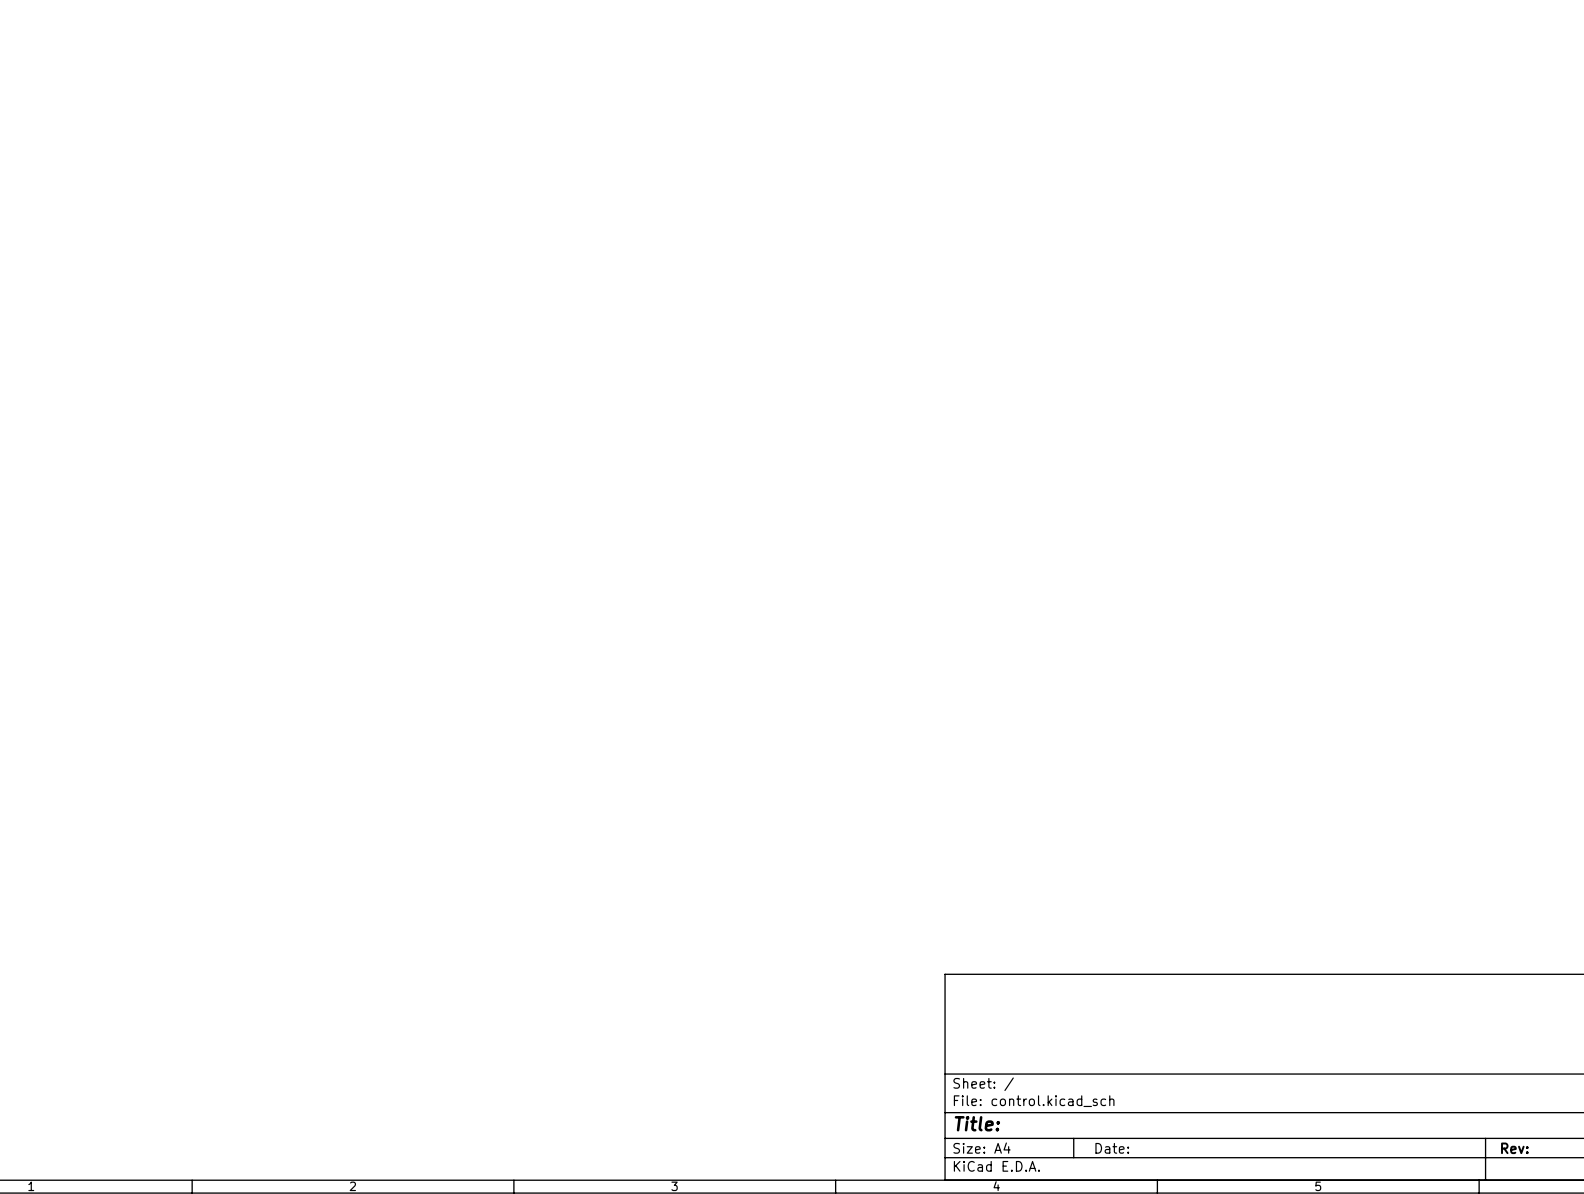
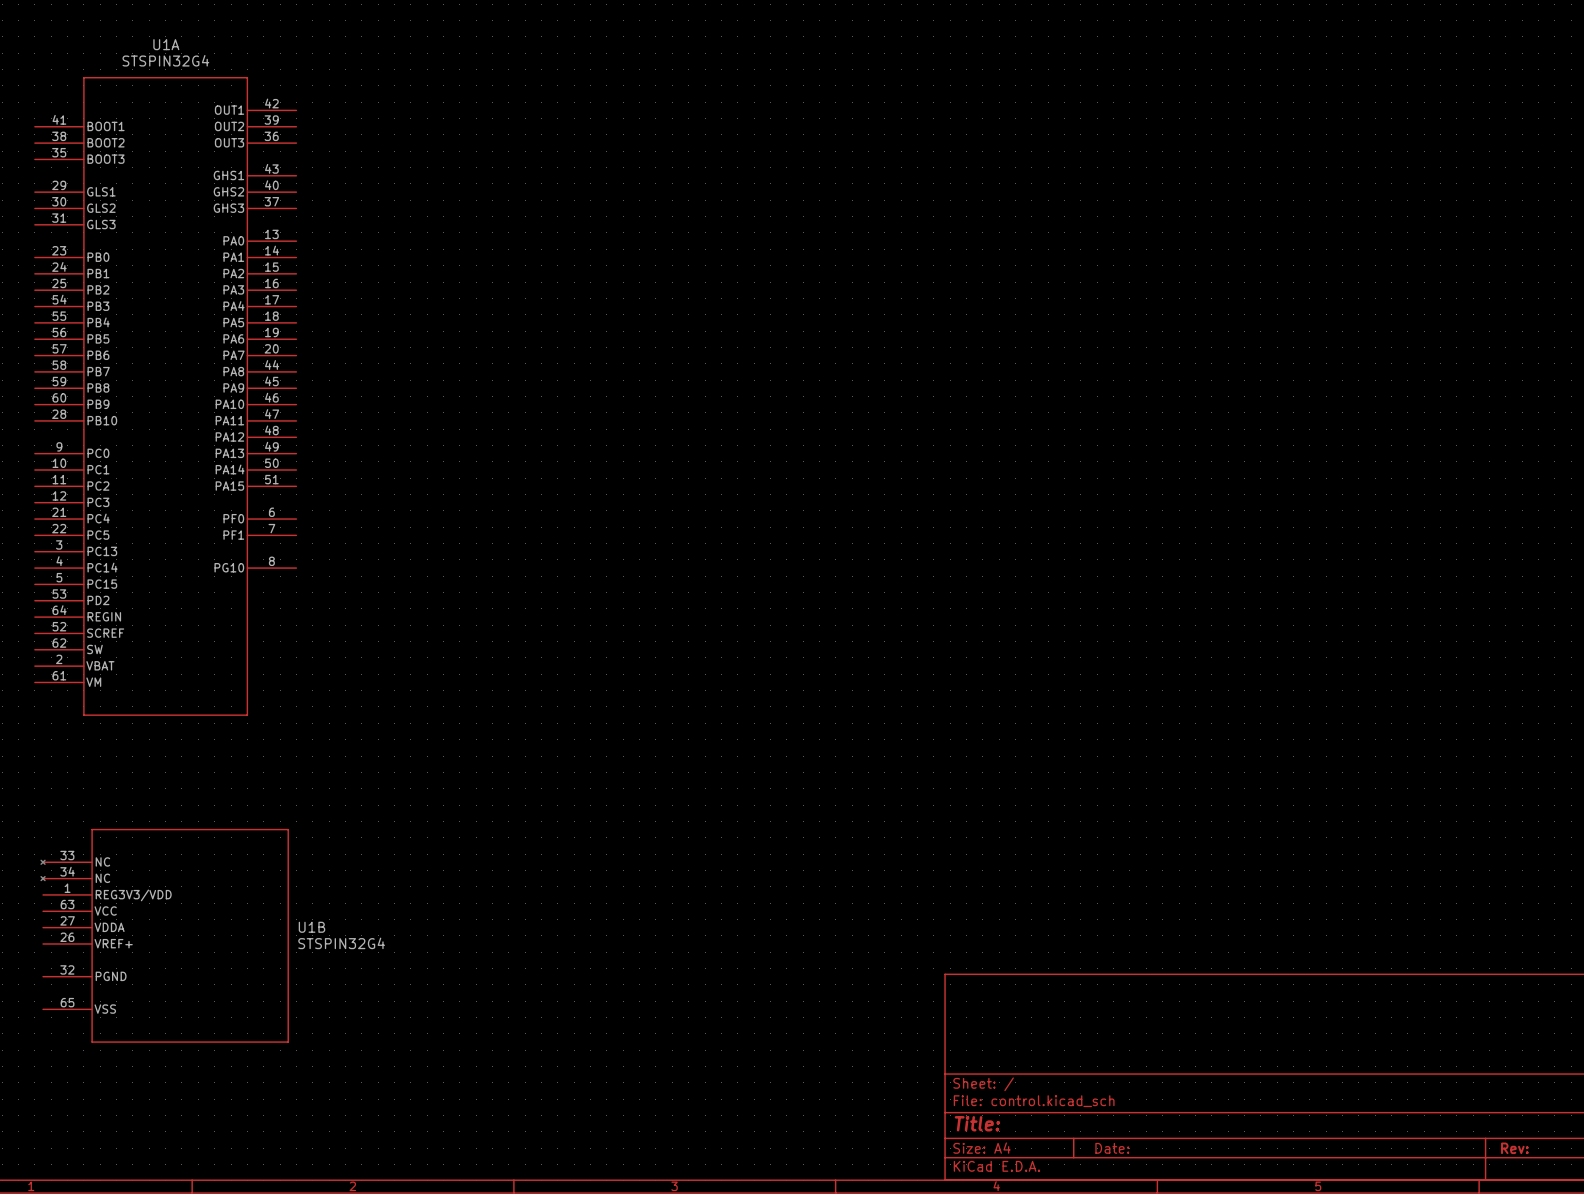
U1A: none -> STSPIN32G4 (165, 396)
U1B: none -> STSPIN32G4 (164, 935)

